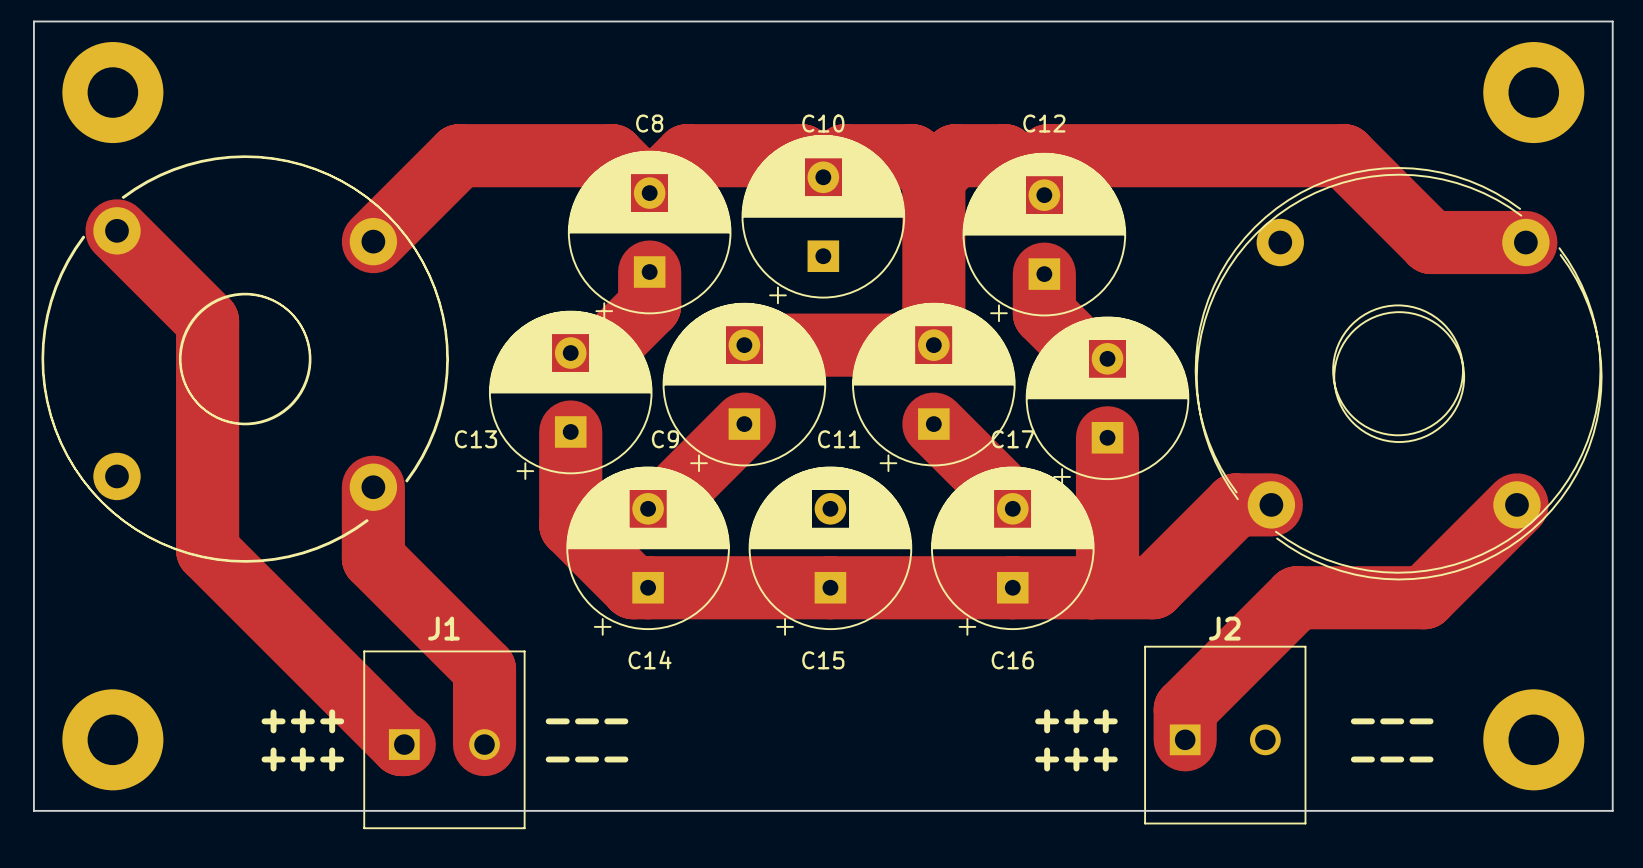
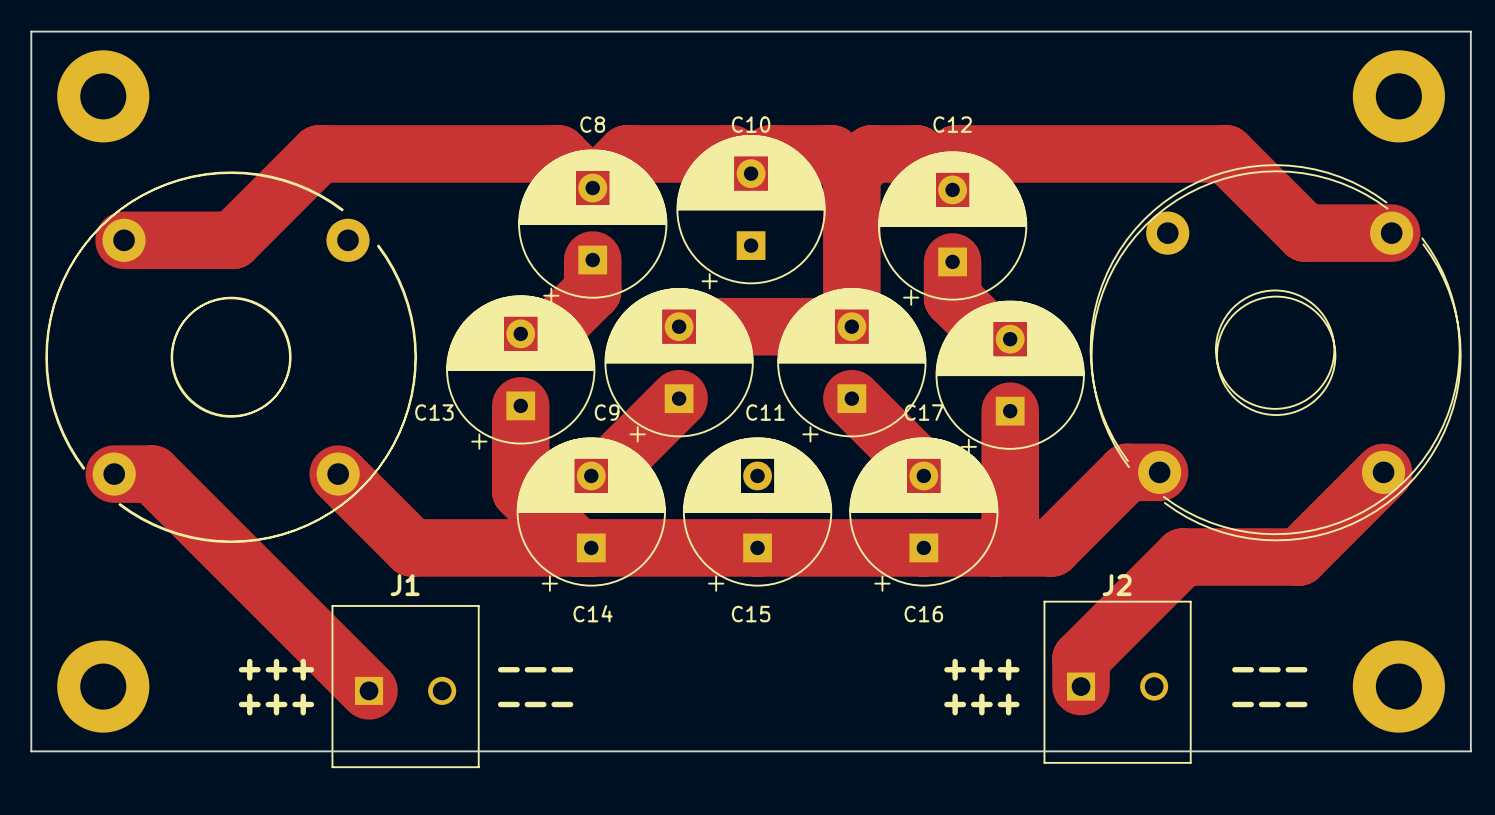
track: (459, 155) (373, 241) -> (419, 153) (319, 153) (232, 240) (124, 240)
track: (117, 230) (207, 321) (207, 550) (401, 744) (404, 744) -> (114, 474) (152, 474) (369, 690)
part: (244, 358) -> none
part: (245, 359) -> none
part: none -> (230, 357)
part: none -> (231, 356)
track: (373, 487) (373, 558) (484, 669) (484, 744) -> none
track: none -> (338, 474) (411, 547) (577, 547)

